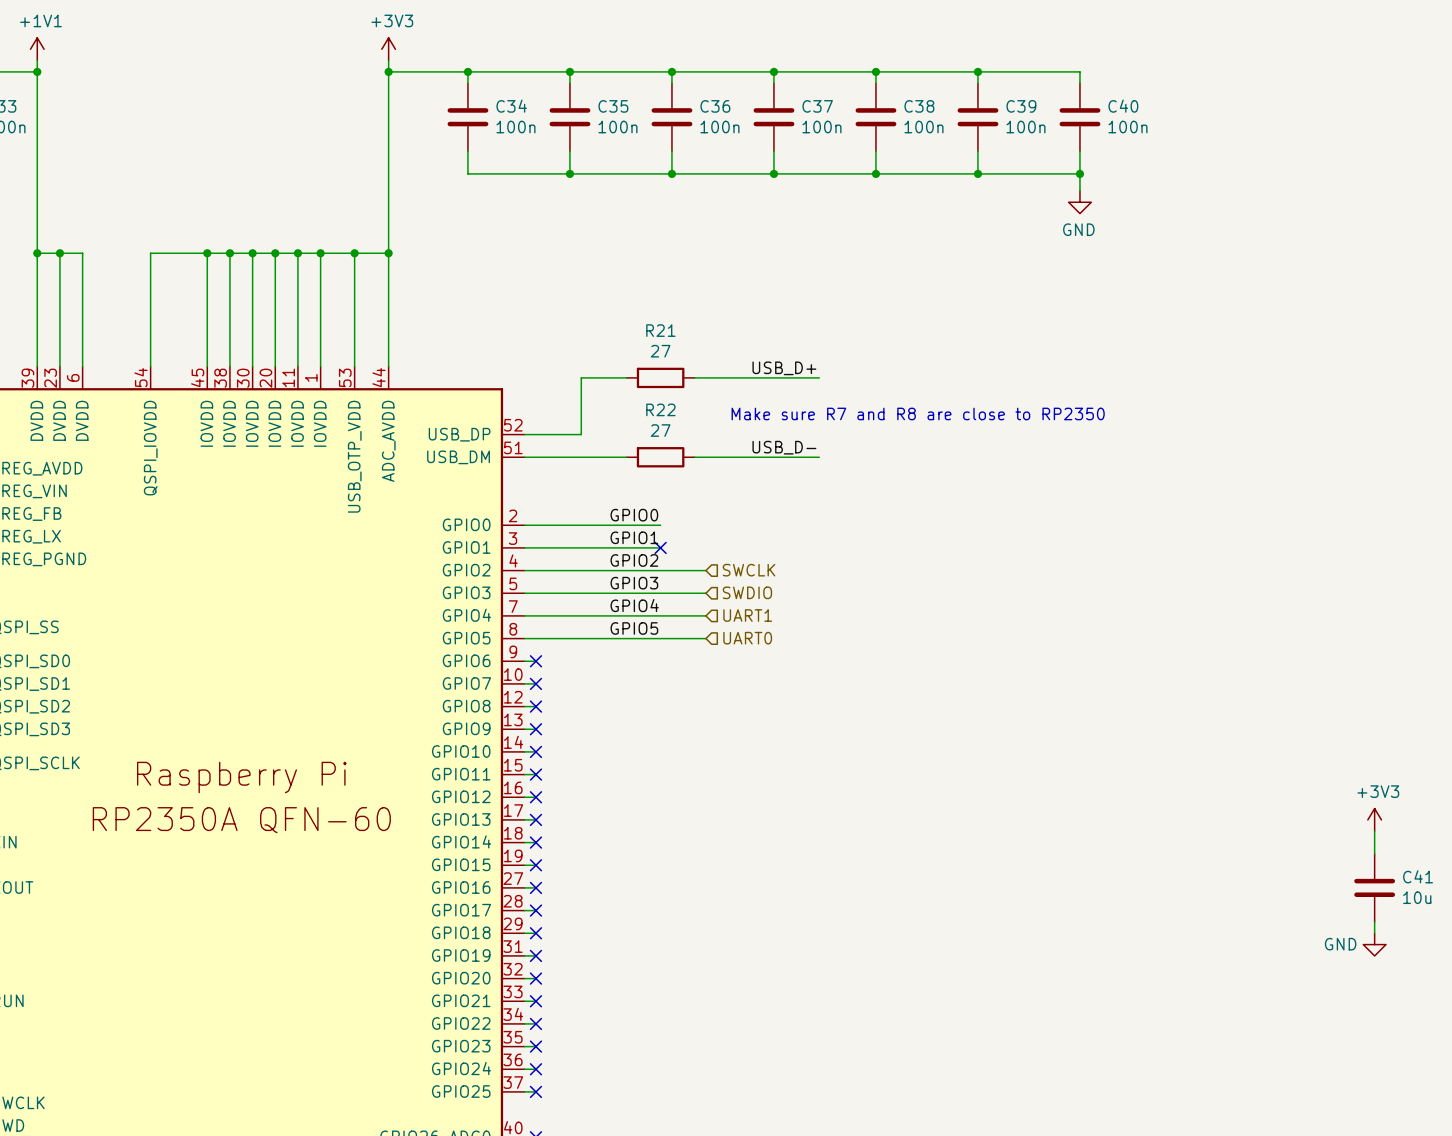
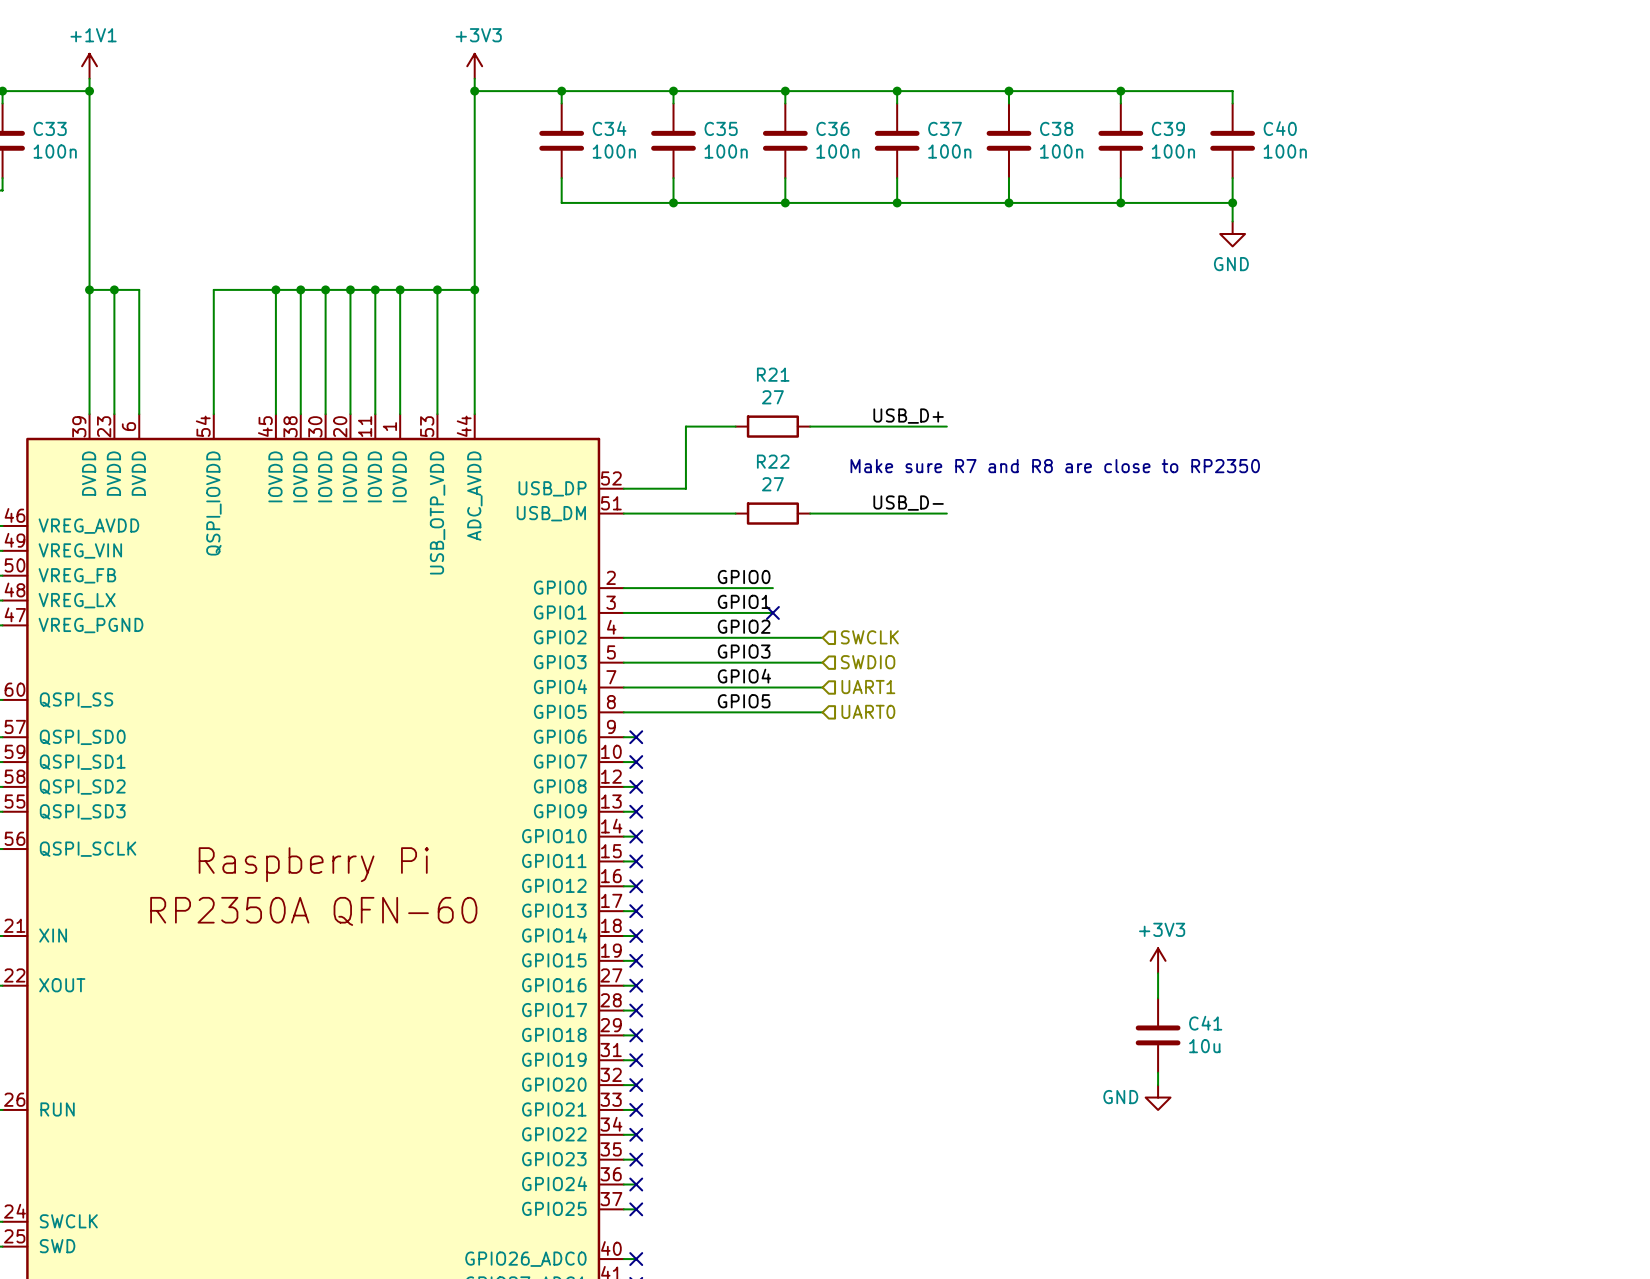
power symbol: +3V3 (1374, 819) -> none
wire: (1374, 831) (1374, 853) -> none
power symbol: none -> +3V3 (1158, 960)
wire: none -> (1158, 973) (1158, 998)
C41 position: (1374, 887) -> (1158, 1035)
wire: (1374, 921) (1374, 933) -> none
power symbol: GND (1374, 944) -> none
wire: none -> (1158, 1072) (1158, 1085)
power symbol: none -> GND (1158, 1097)

